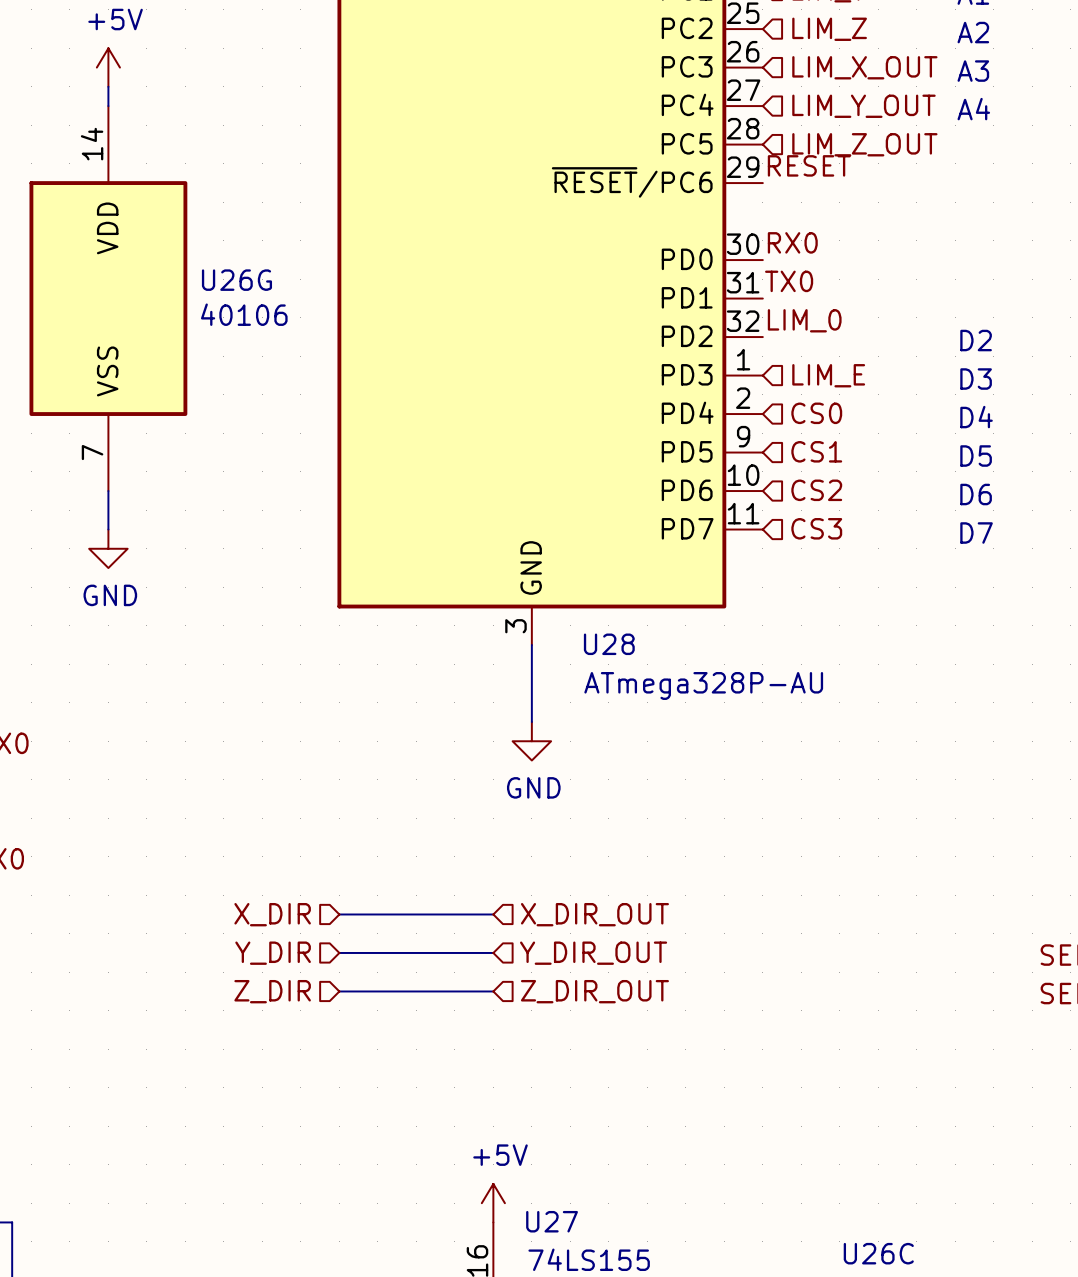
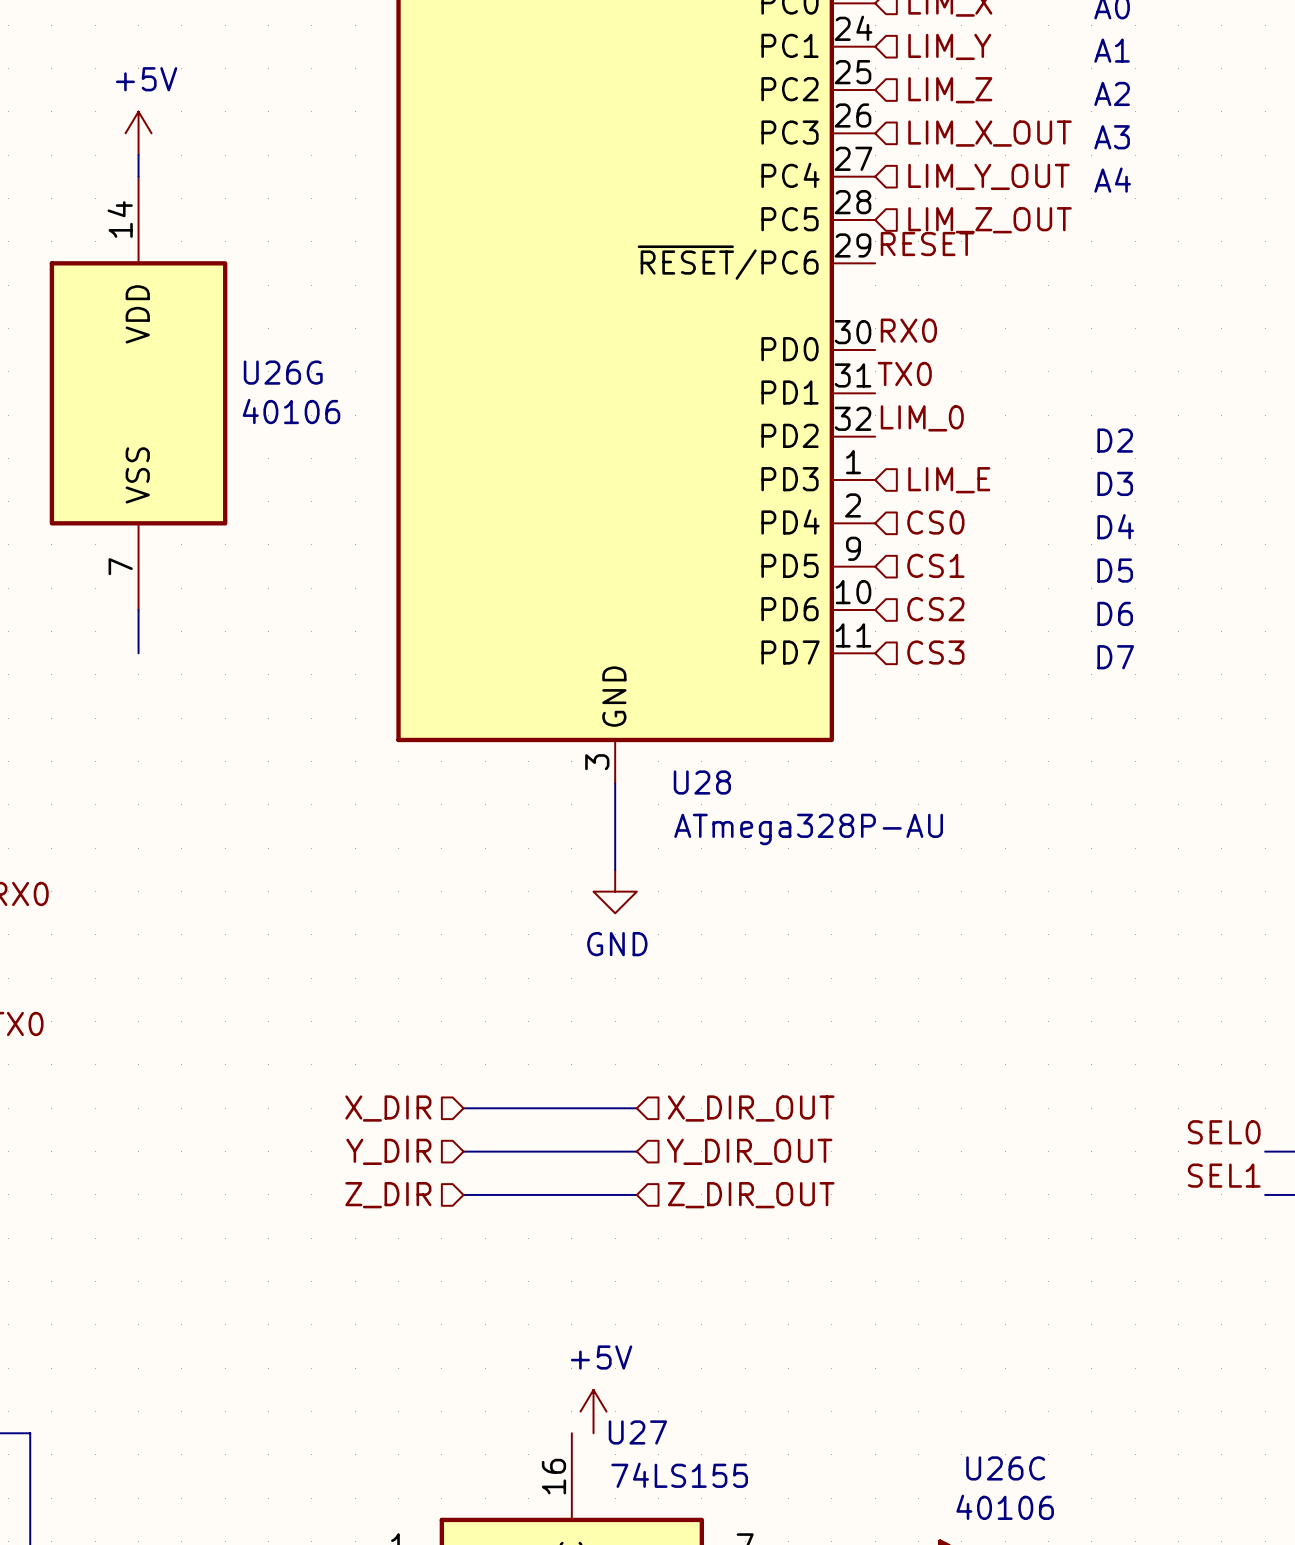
power symbol: GND (108, 548) -> none
hierarchical label position: X_DIR (272, 914) -> X_DIR (388, 1108)
wire: (339, 914) (493, 914) -> (463, 1108) (636, 1108)
hierarchical label position: X_DIR_OUT (594, 914) -> X_DIR_OUT (751, 1108)
wire: (339, 952) (493, 952) -> (463, 1151) (636, 1151)
hierarchical label position: Y_DIR (273, 953) -> Y_DIR (388, 1151)
hierarchical label position: Y_DIR_OUT (593, 953) -> Y_DIR_OUT (749, 1151)
hierarchical label position: Z_DIR (272, 991) -> Z_DIR (388, 1195)
wire: (339, 991) (493, 991) -> (463, 1194) (636, 1194)
hierarchical label position: Z_DIR_OUT (594, 991) -> Z_DIR_OUT (751, 1195)
power symbol position: +5V (493, 1203) -> +5V (593, 1411)

